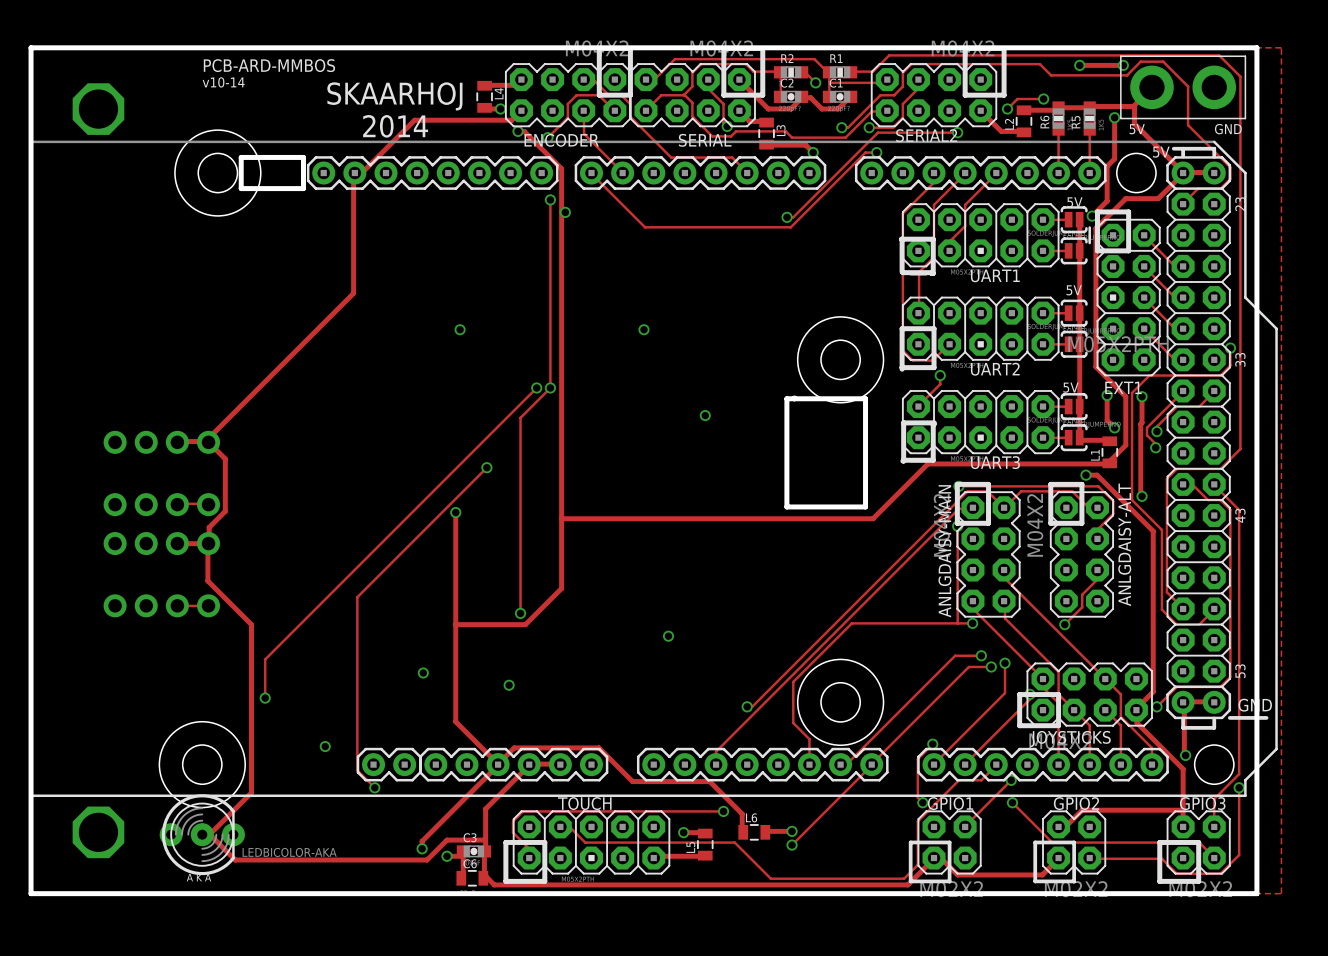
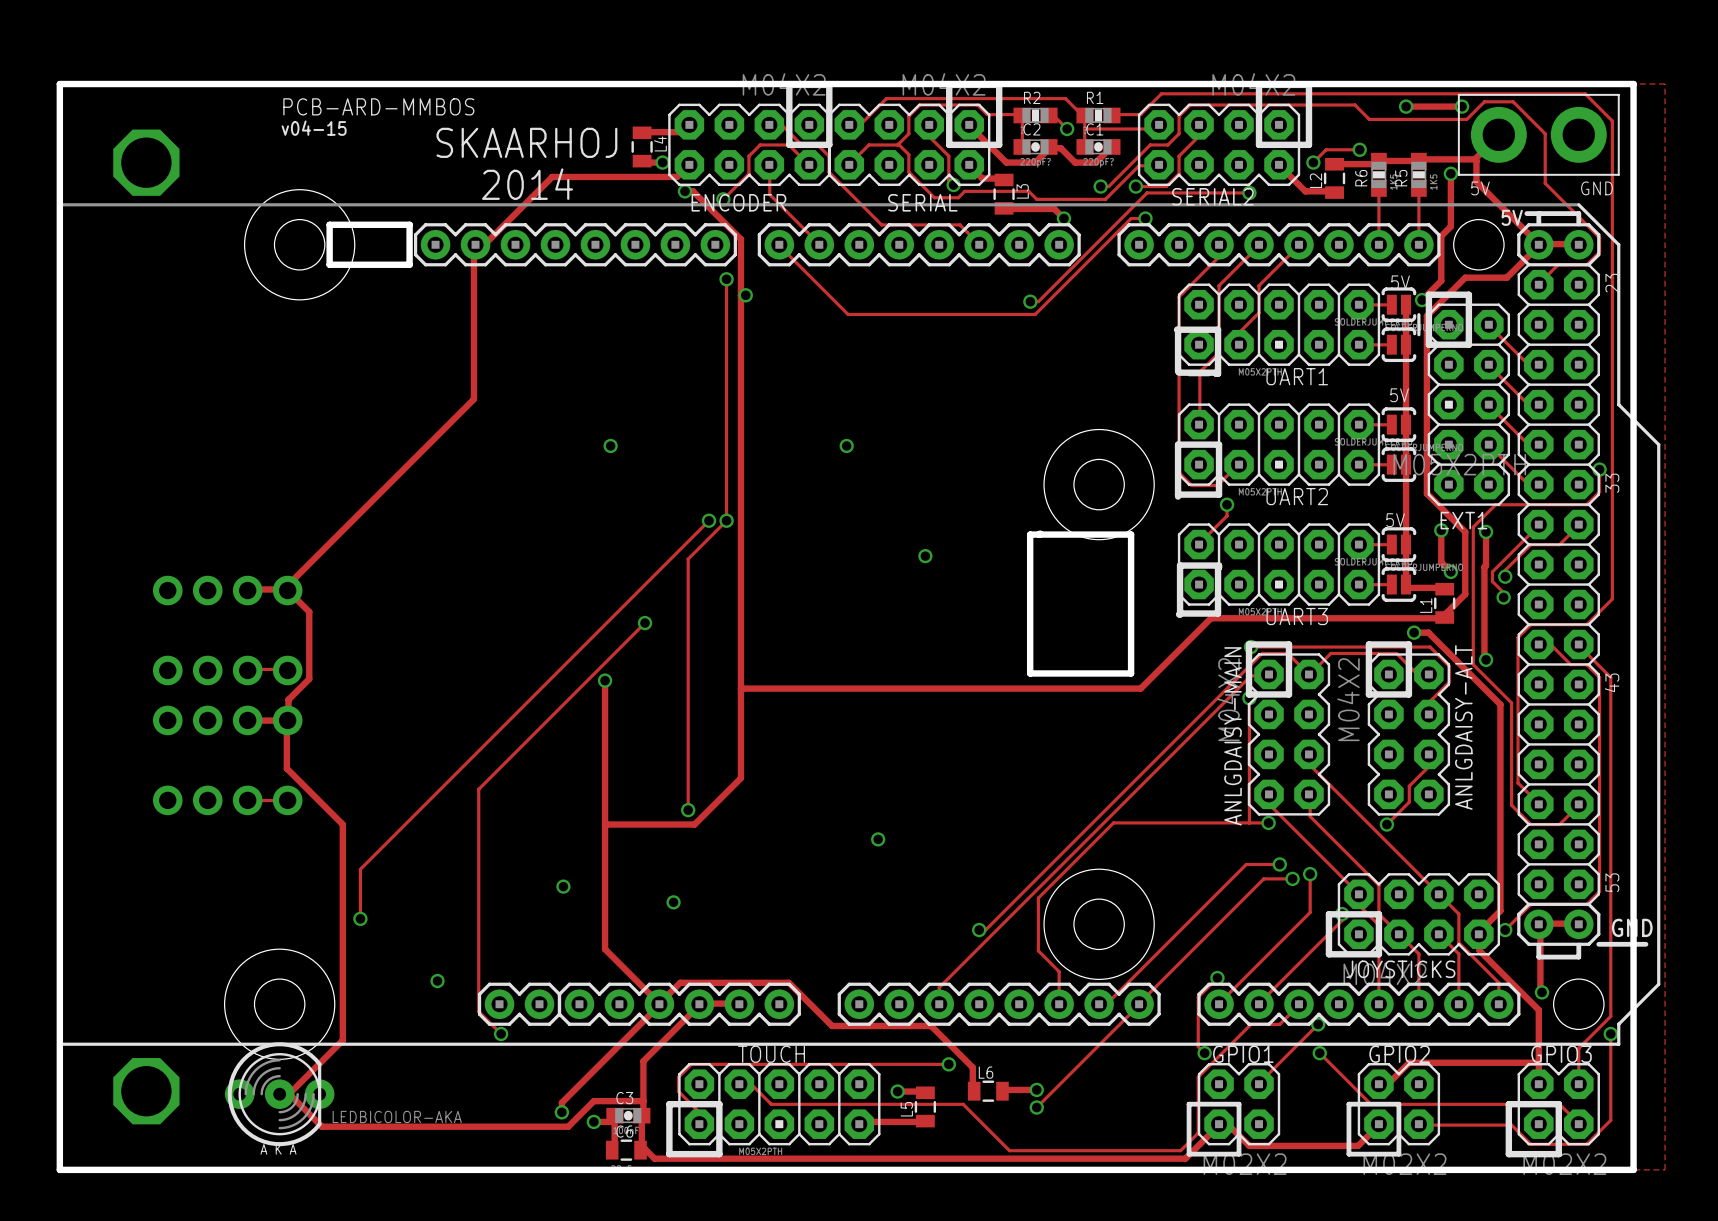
text: v10-14 (223, 82) -> v04-15 (314, 128)

